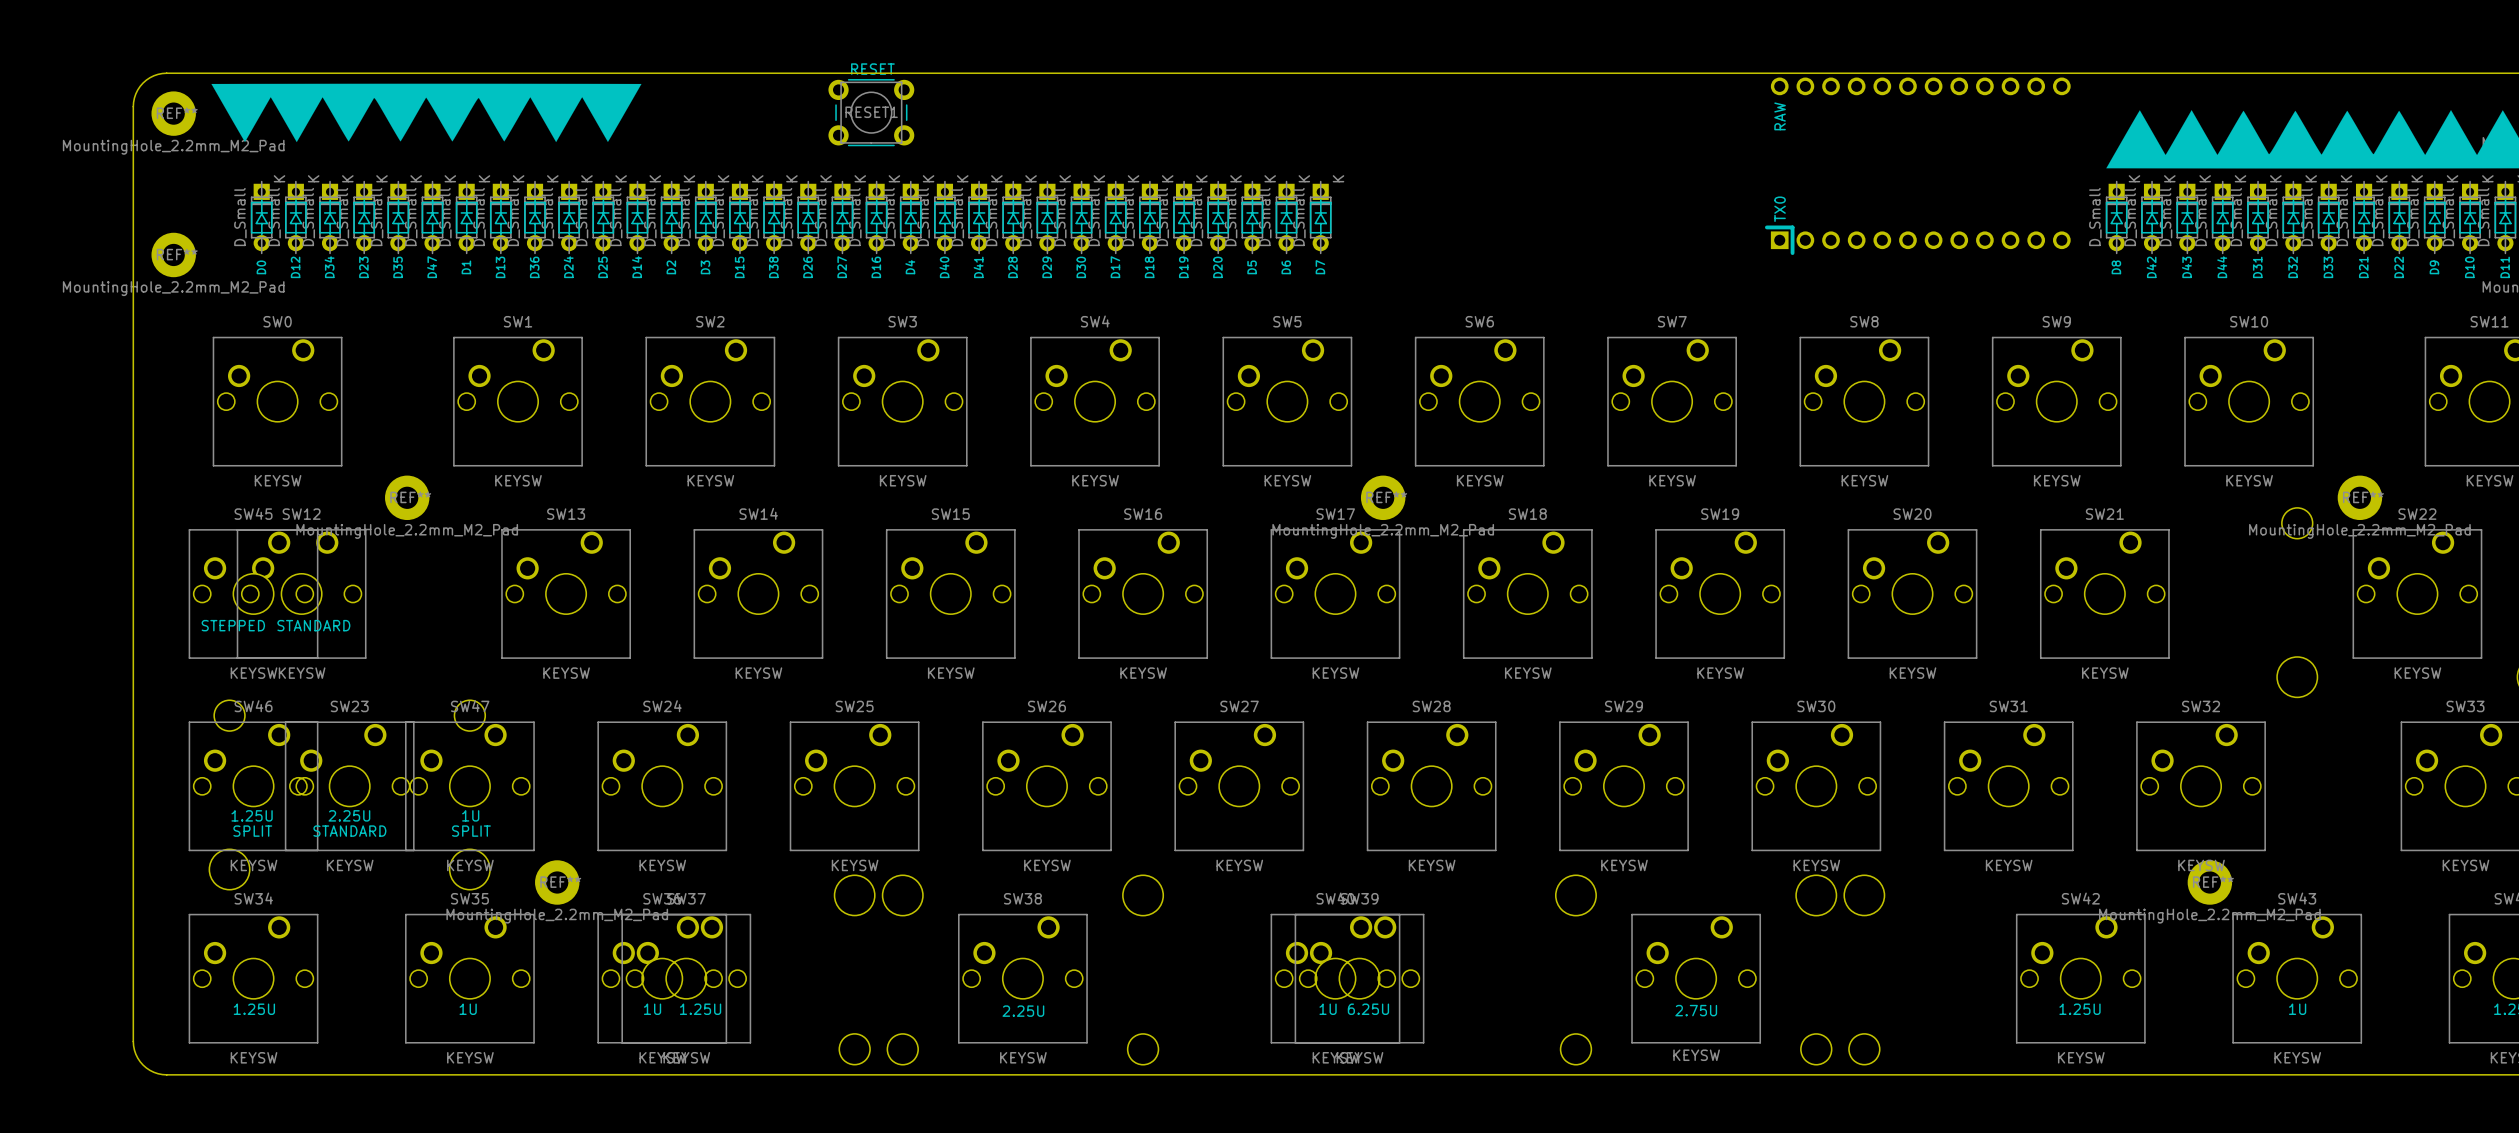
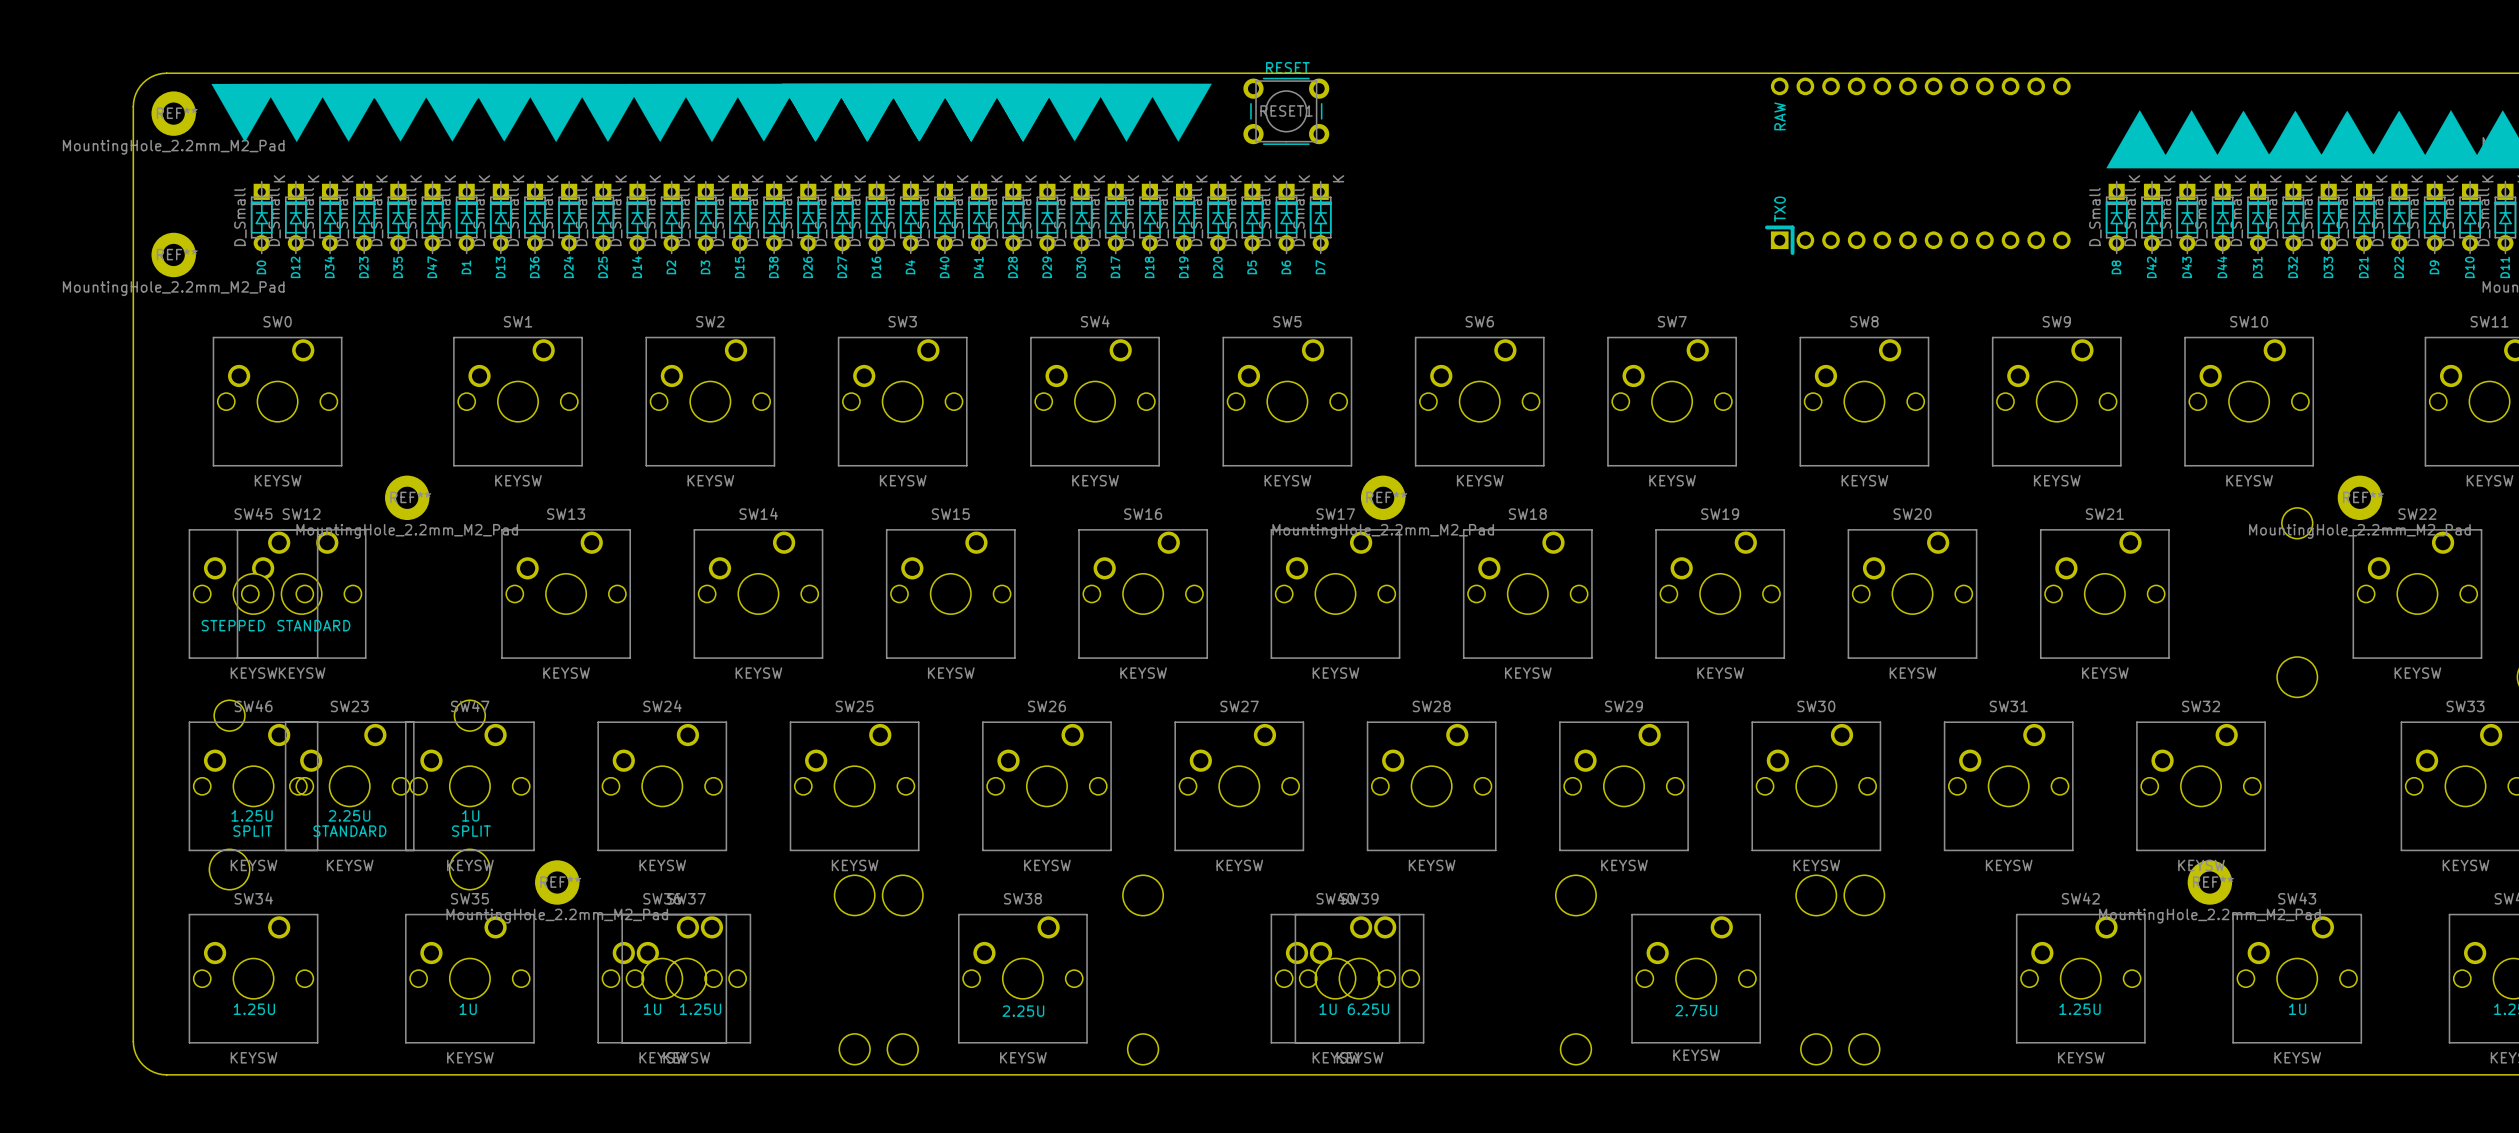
drawing: none -> [626, 83, 1212, 143]
RESET1 position: (871, 112) -> (1286, 111)

